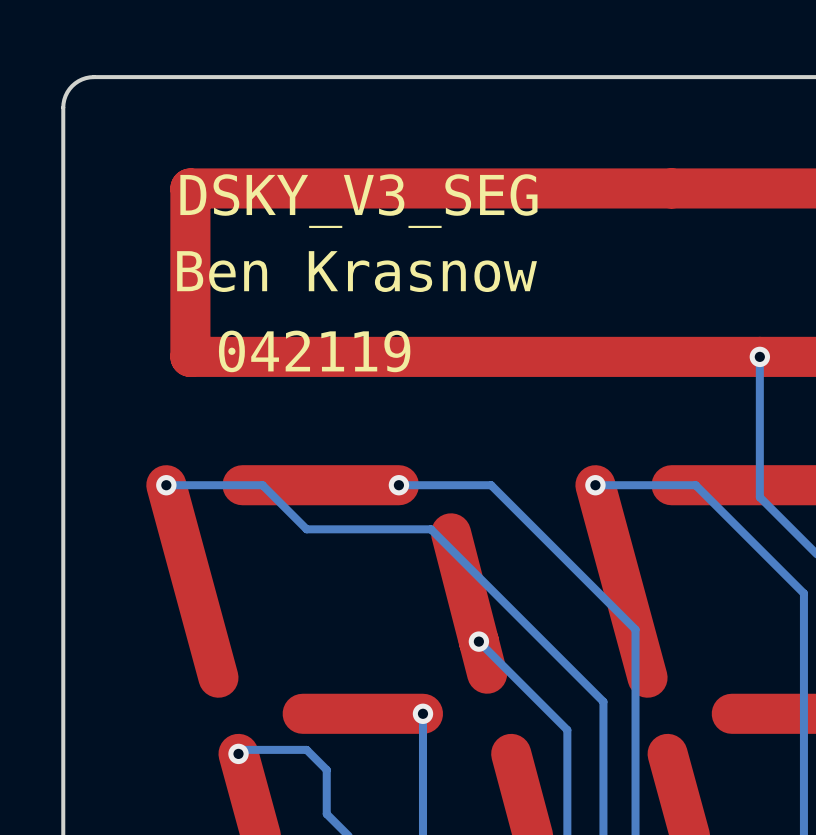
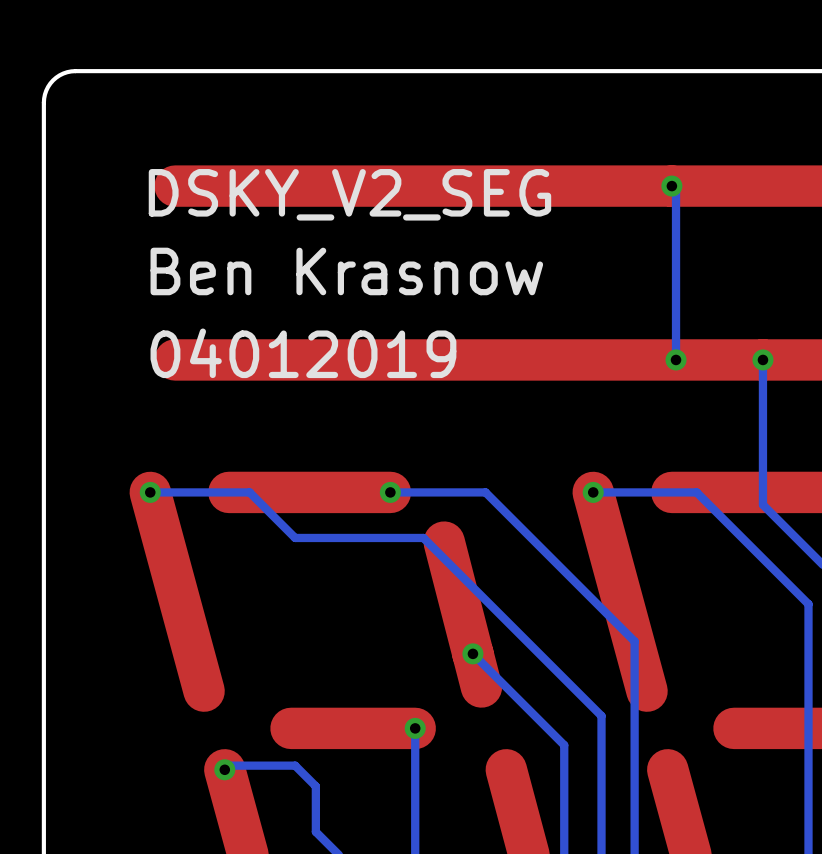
top track: (190, 188) (190, 356) -> none
bottom track: none -> (671, 186) (676, 190) (676, 359)
via: none -> (671, 186)
text: DSKY_V3_SEG (358, 201) -> DSKY_V2_SEG (349, 194)
text: 042119 (314, 351) -> 04012019 (303, 353)
via: none -> (676, 359)

